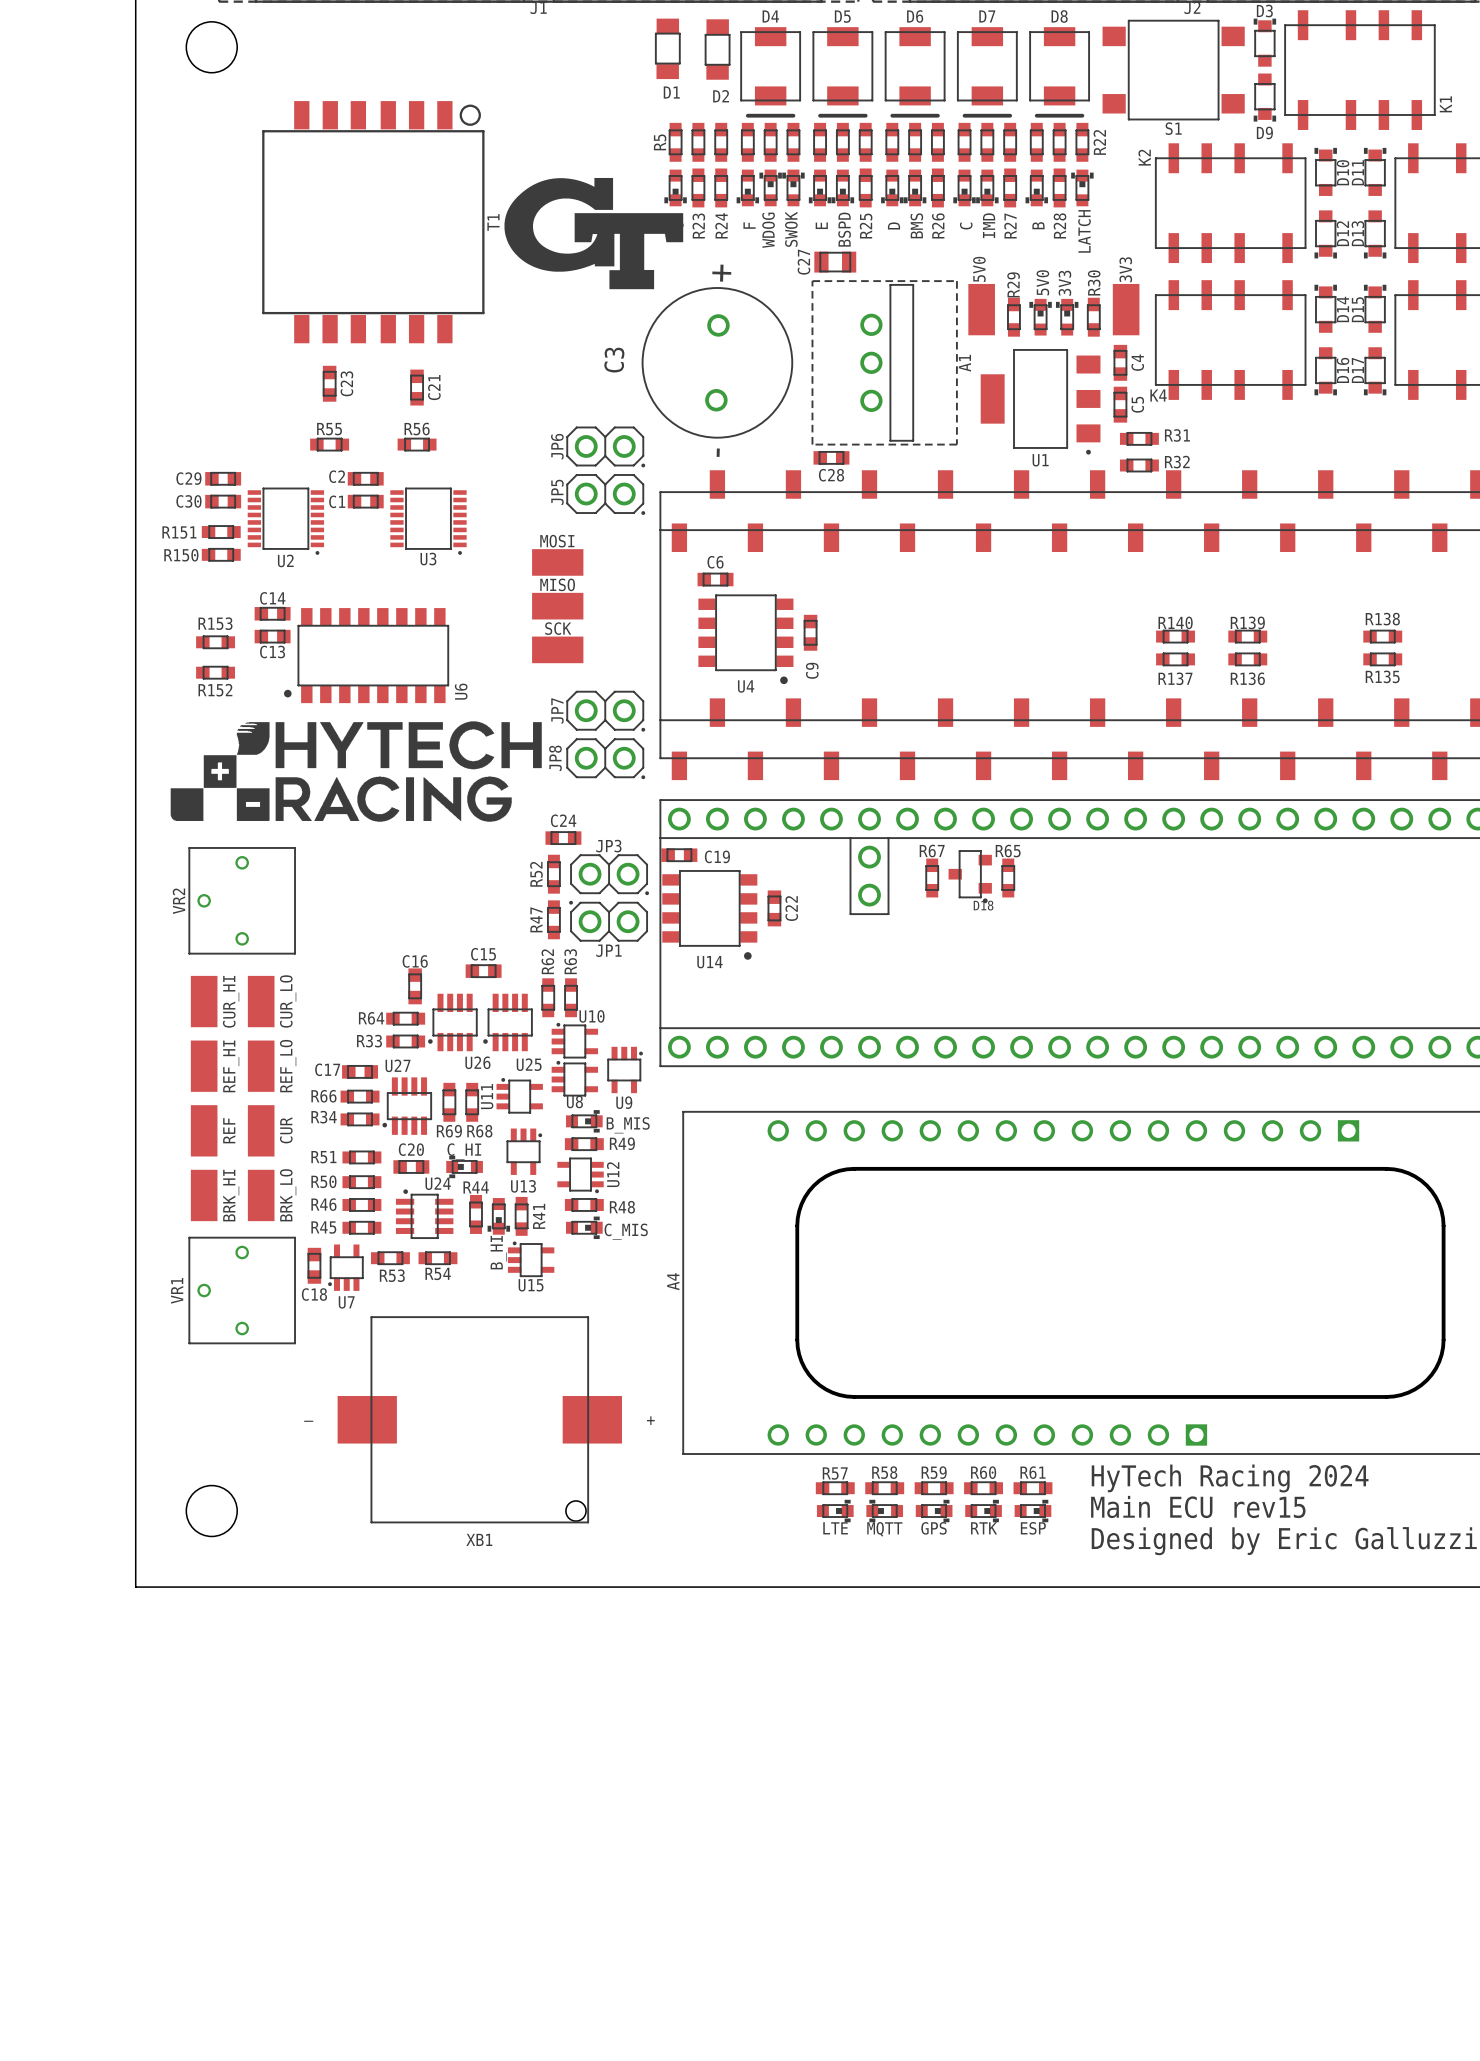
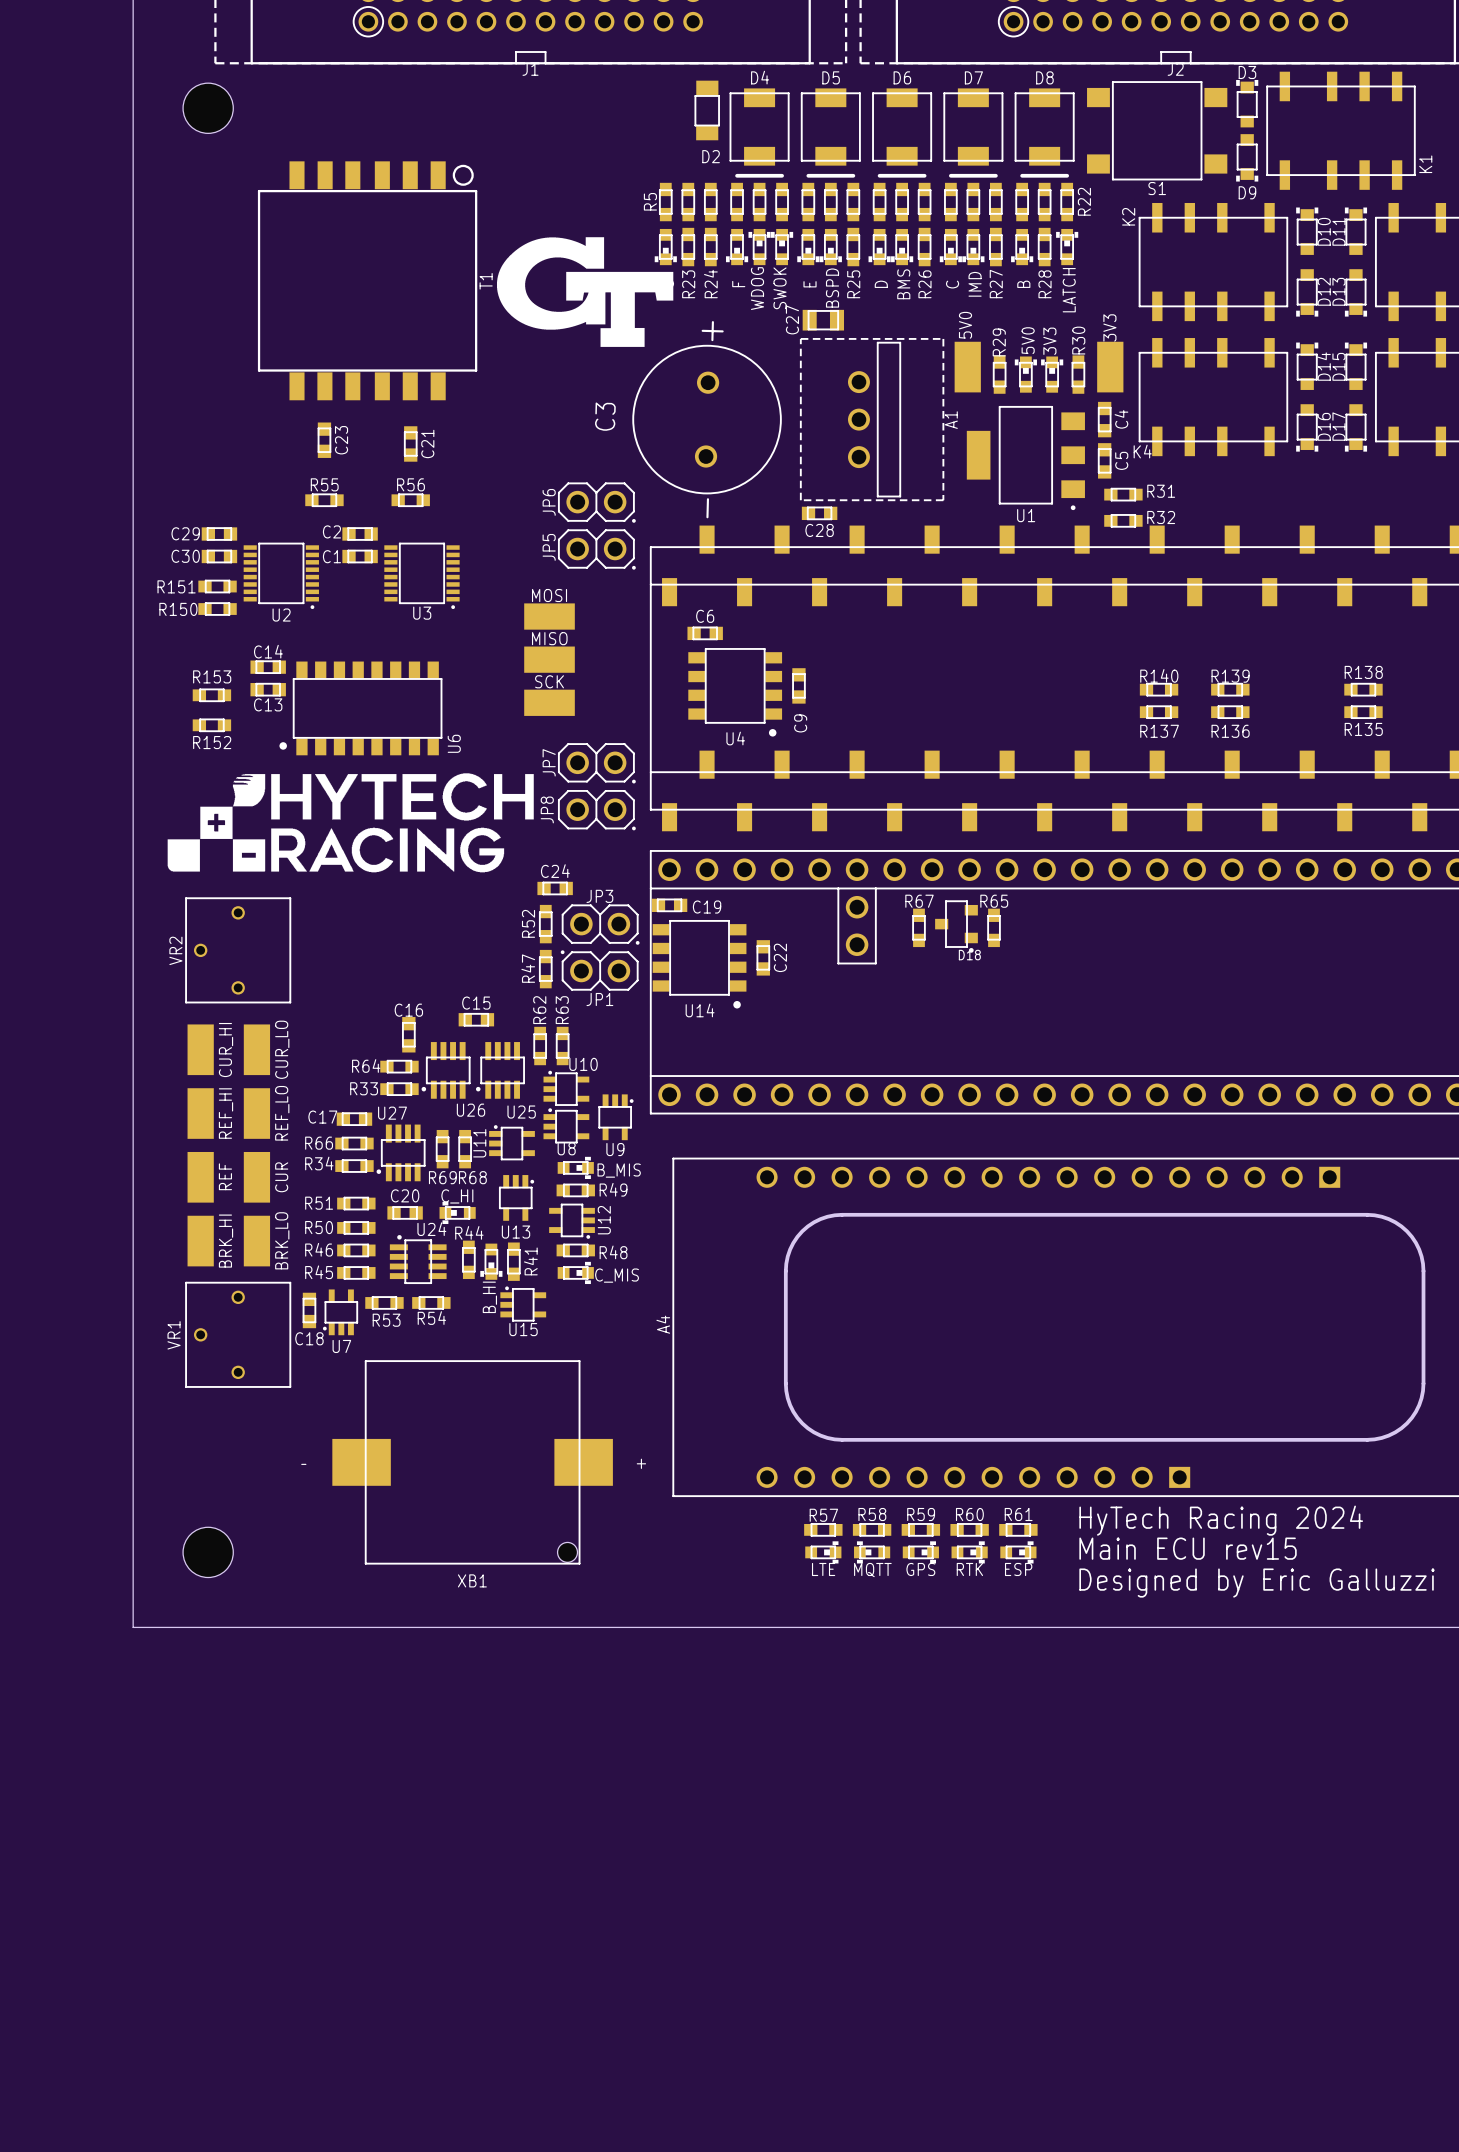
D1: (667, 48) -> none

